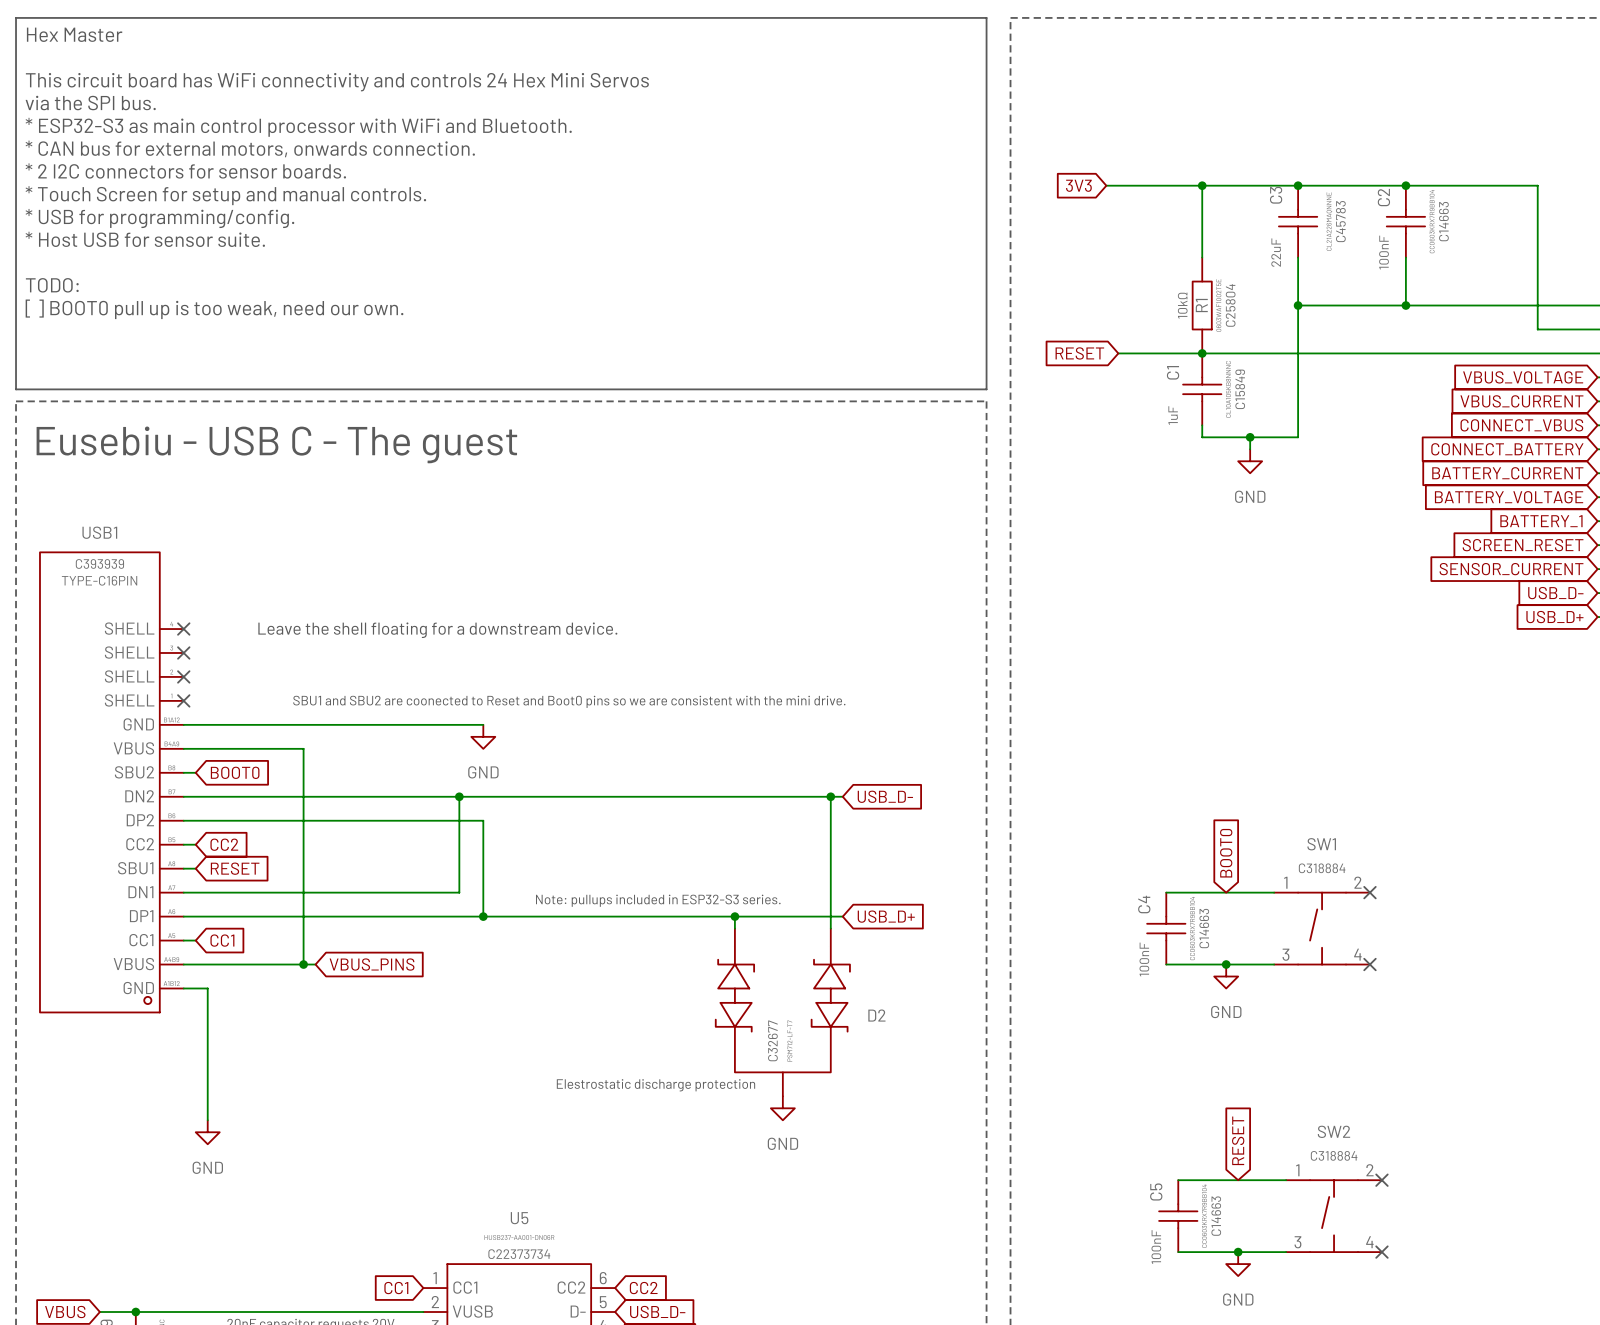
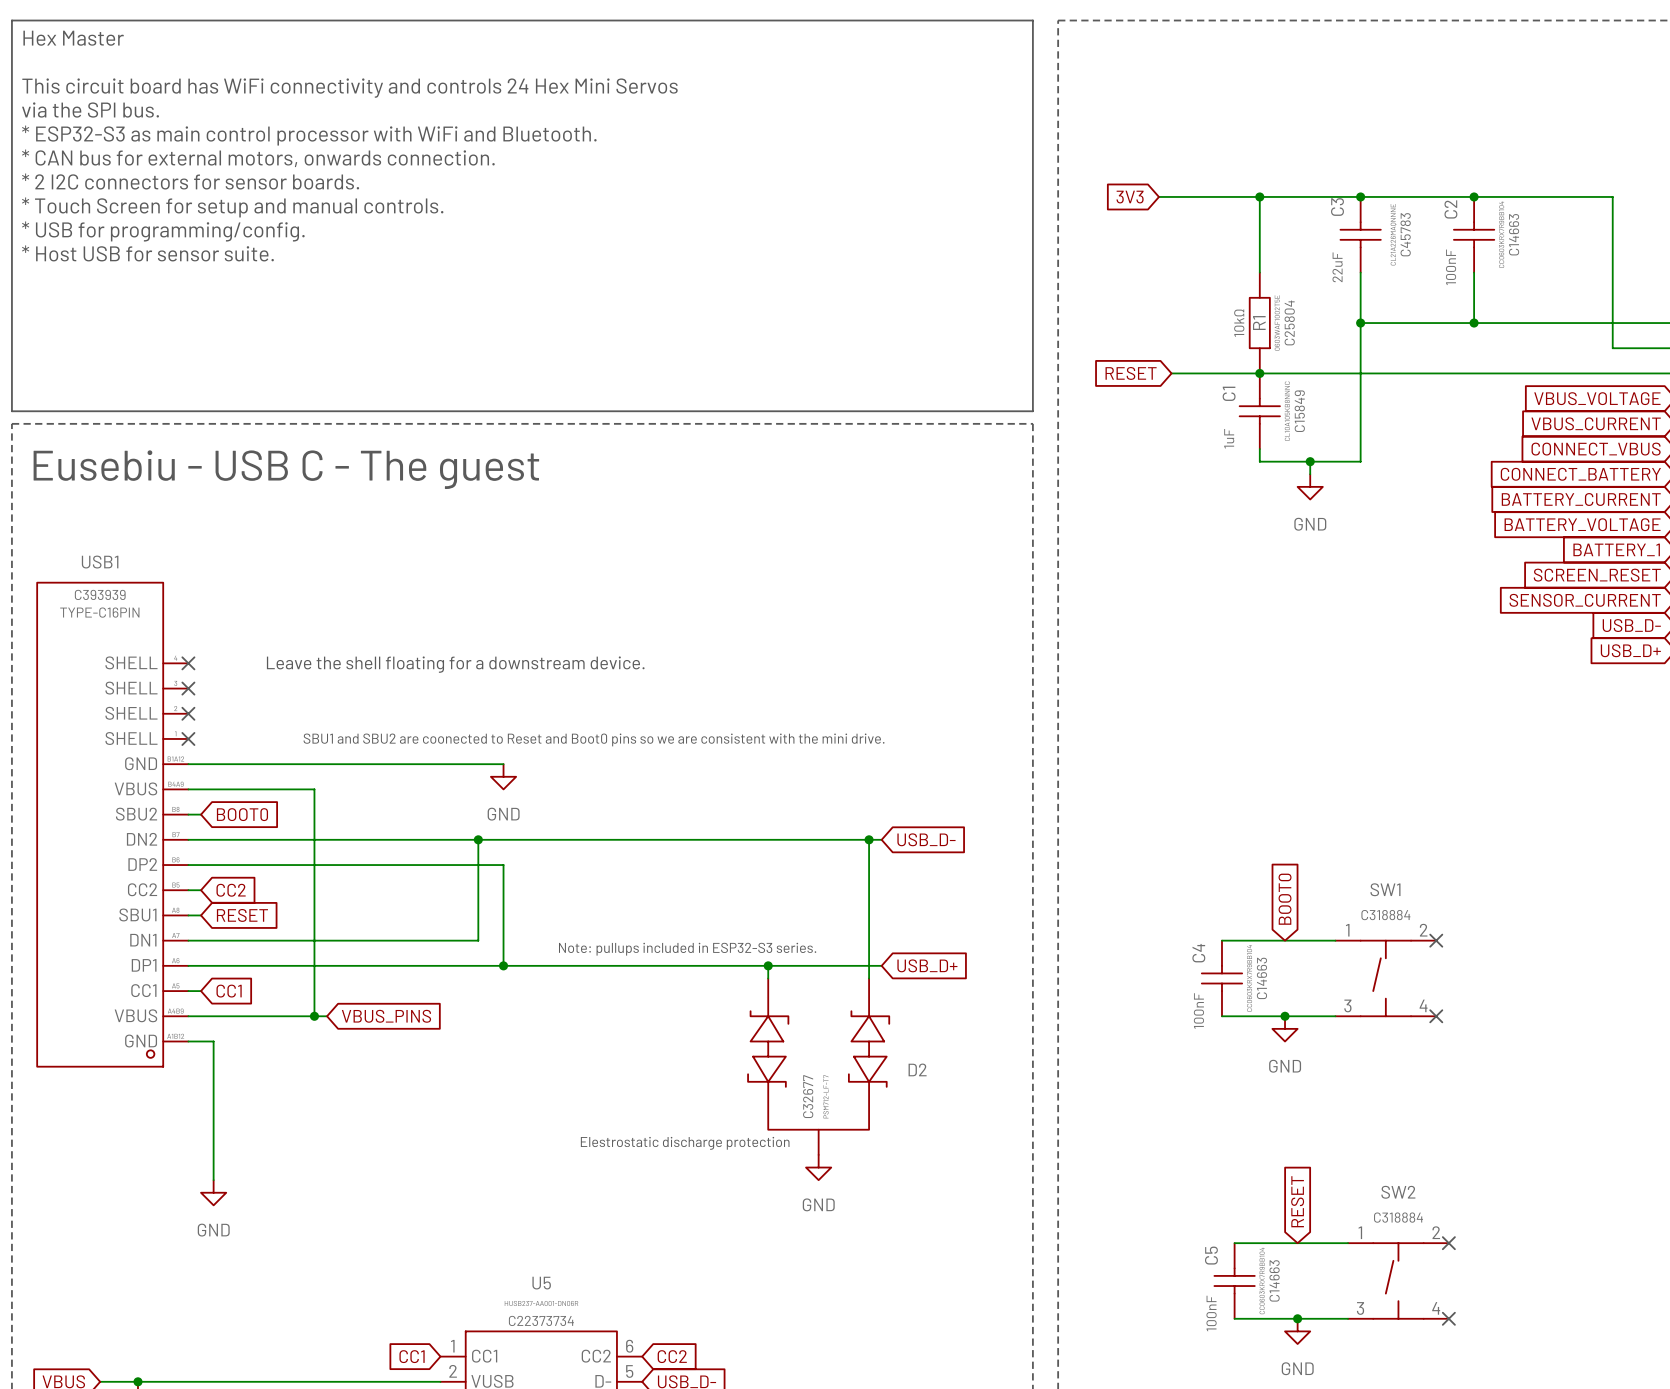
text: TODO: (52, 285) -> none
text: [ ] BOOT0 pull up is too weak, need our own. (214, 309) -> none

